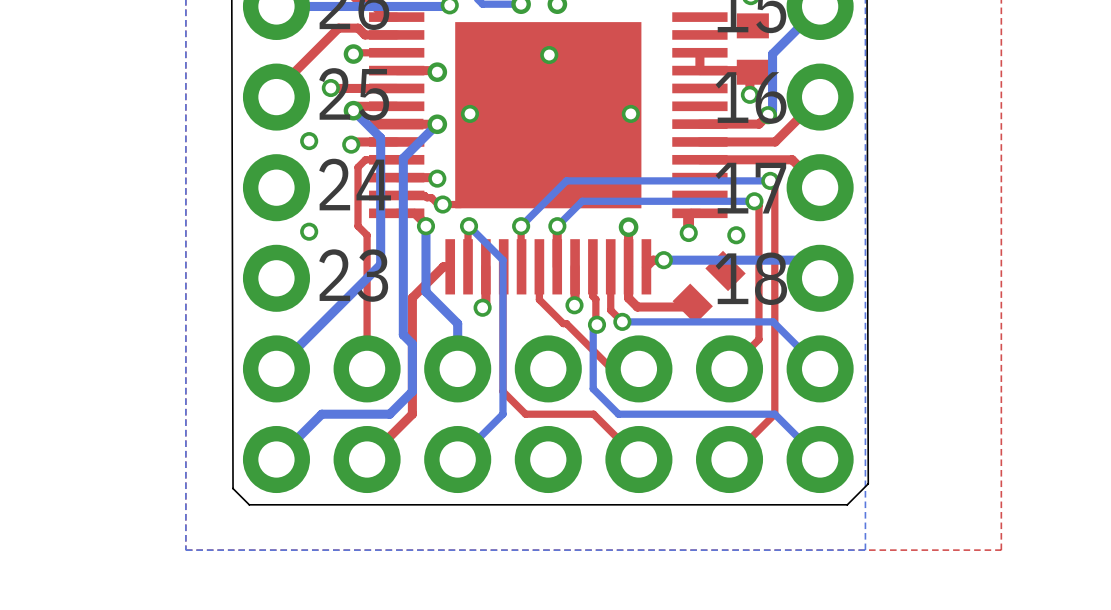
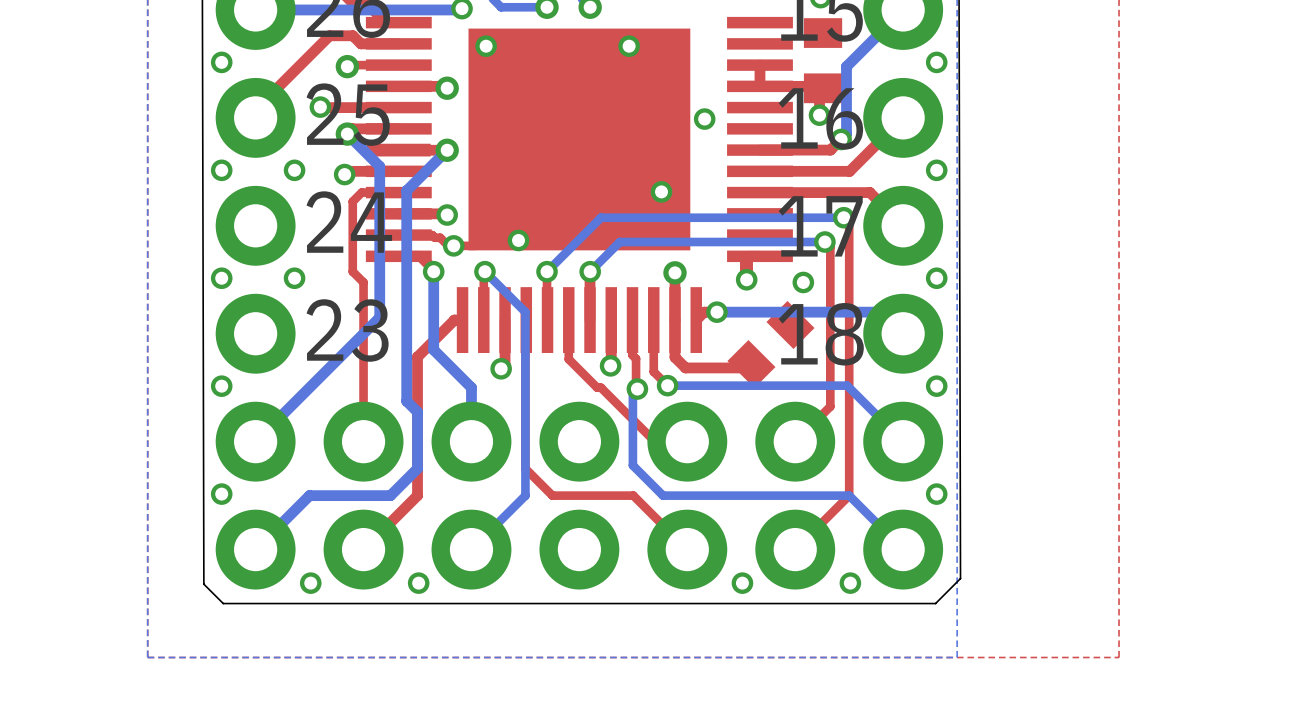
via: none -> (486, 46)
via: none -> (629, 46)
via: none -> (221, 62)
via: none -> (936, 62)
via: (549, 55) -> none
via: none -> (704, 119)
via: (470, 113) -> none
via: (630, 113) -> none
via: none -> (221, 170)
via: none -> (936, 170)
via: none -> (661, 191)
via: none -> (518, 240)
via: none -> (221, 278)
via: none -> (936, 278)
via: none -> (221, 386)
via: none -> (936, 386)
via: none -> (221, 494)
via: none -> (936, 494)
via: none -> (310, 583)
via: none -> (418, 583)
via: none -> (742, 583)
via: none -> (850, 583)

